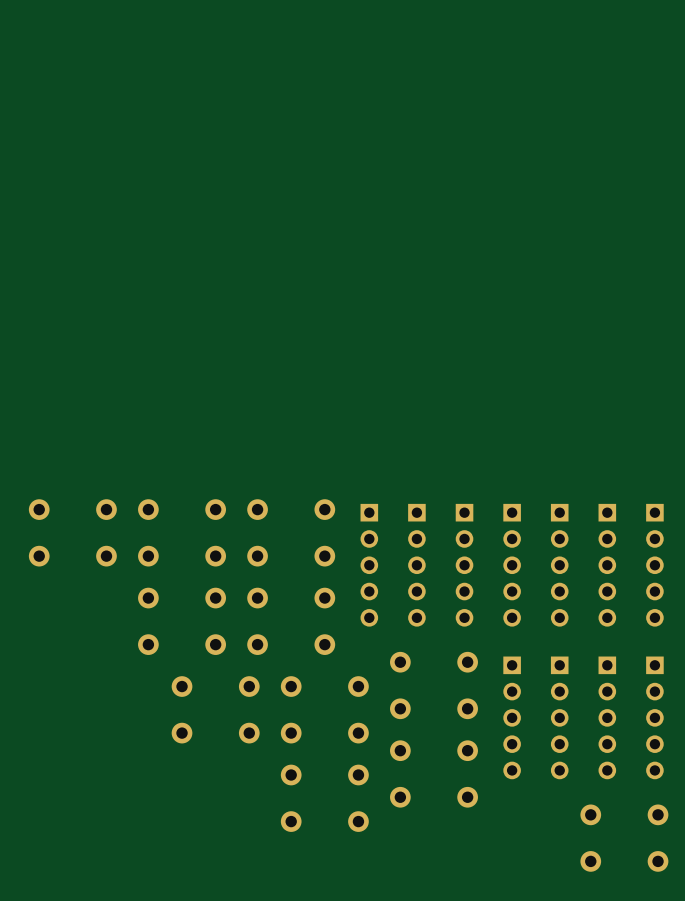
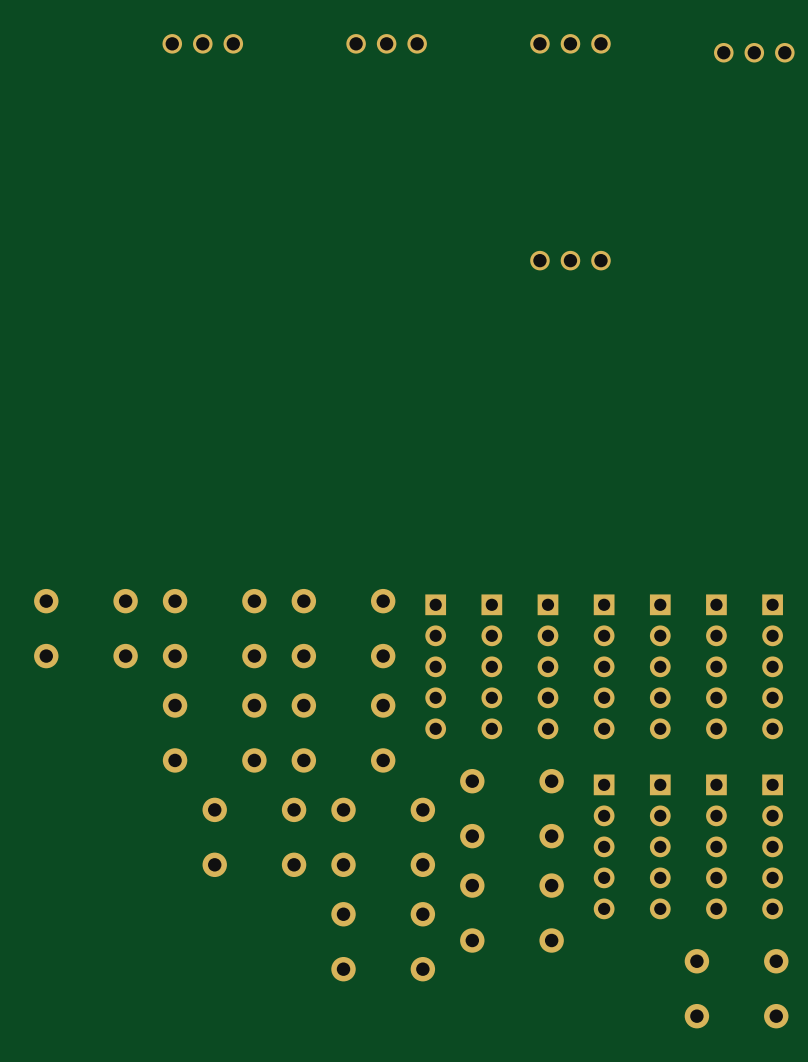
part: none -> (202, 43)
part: none -> (386, 43)
part: none -> (570, 43)
part: none -> (754, 52)
part: none -> (570, 260)

